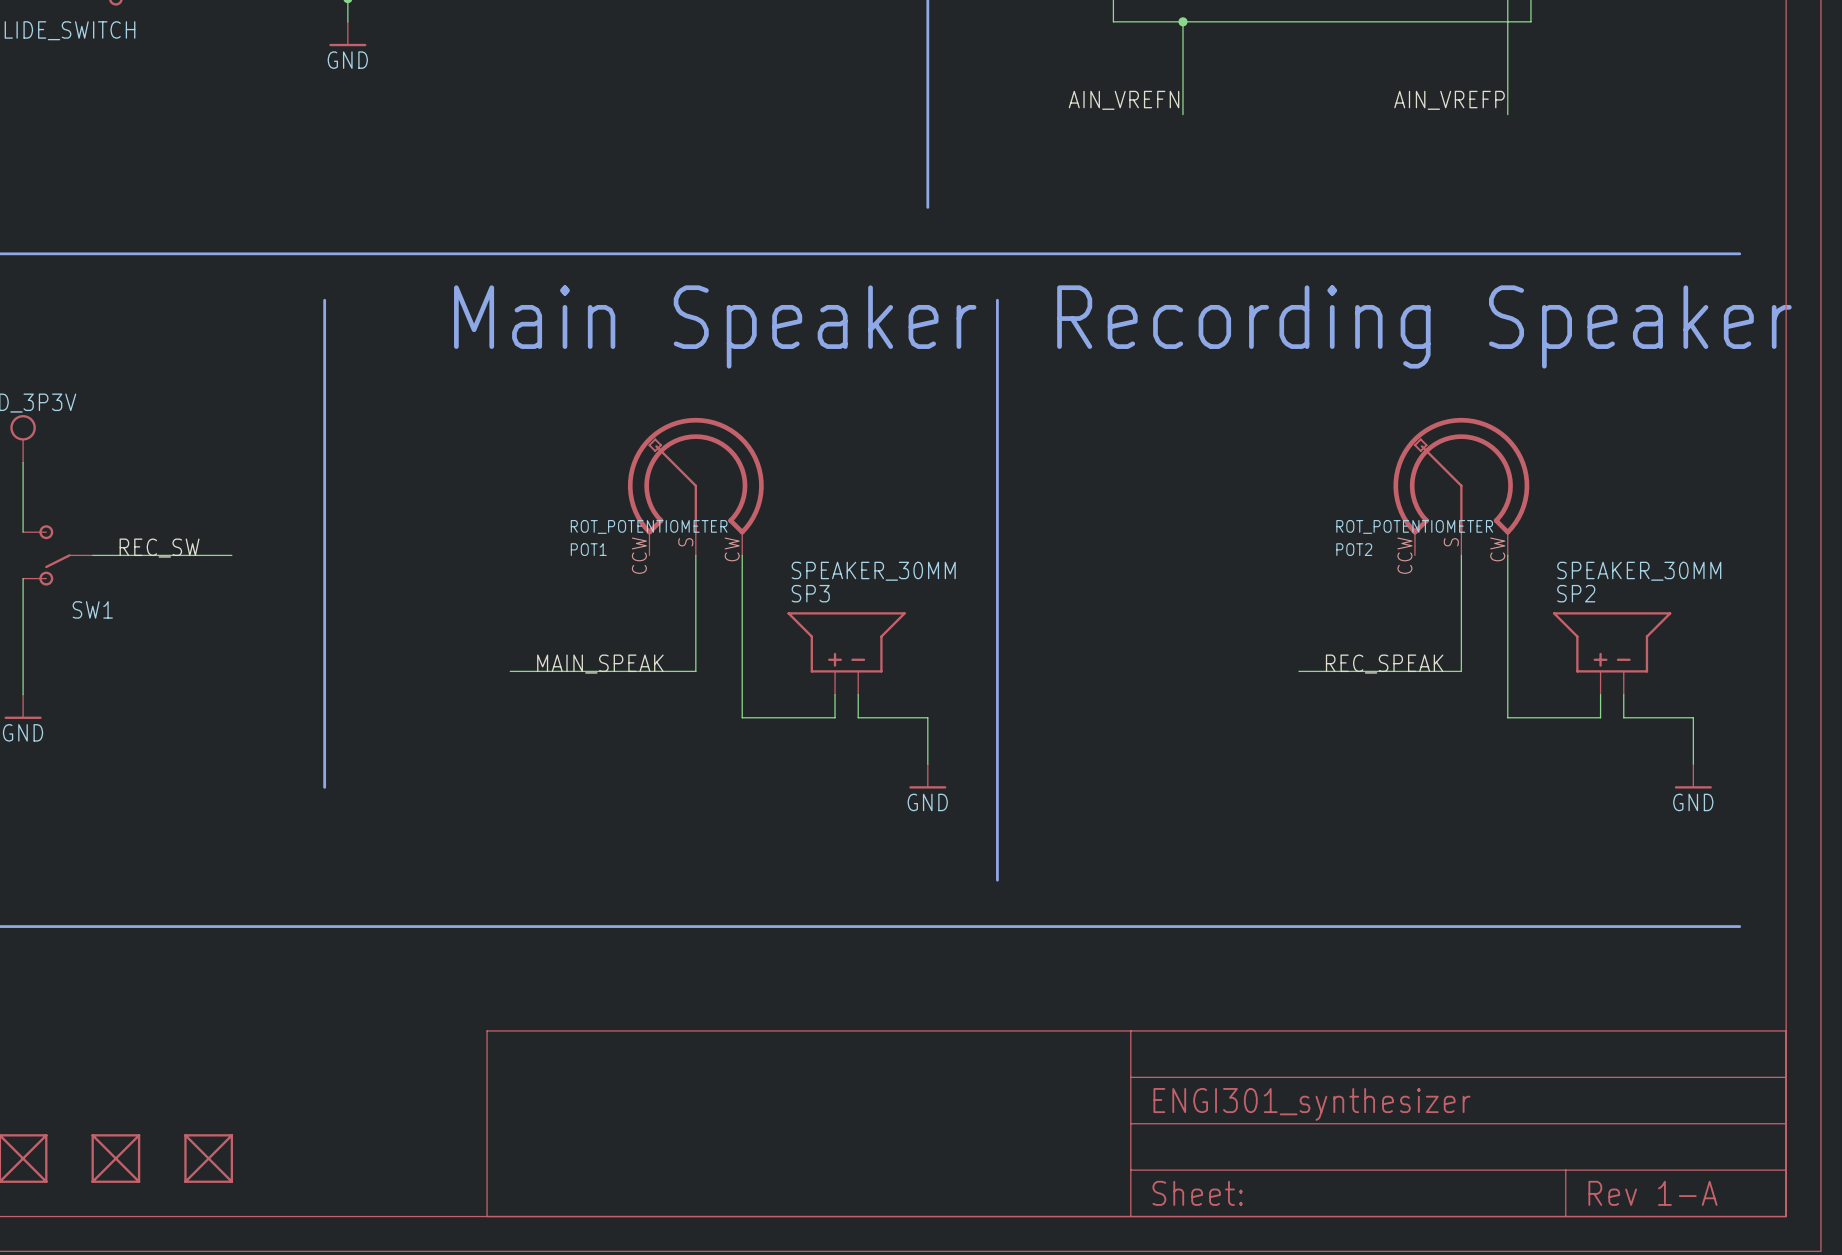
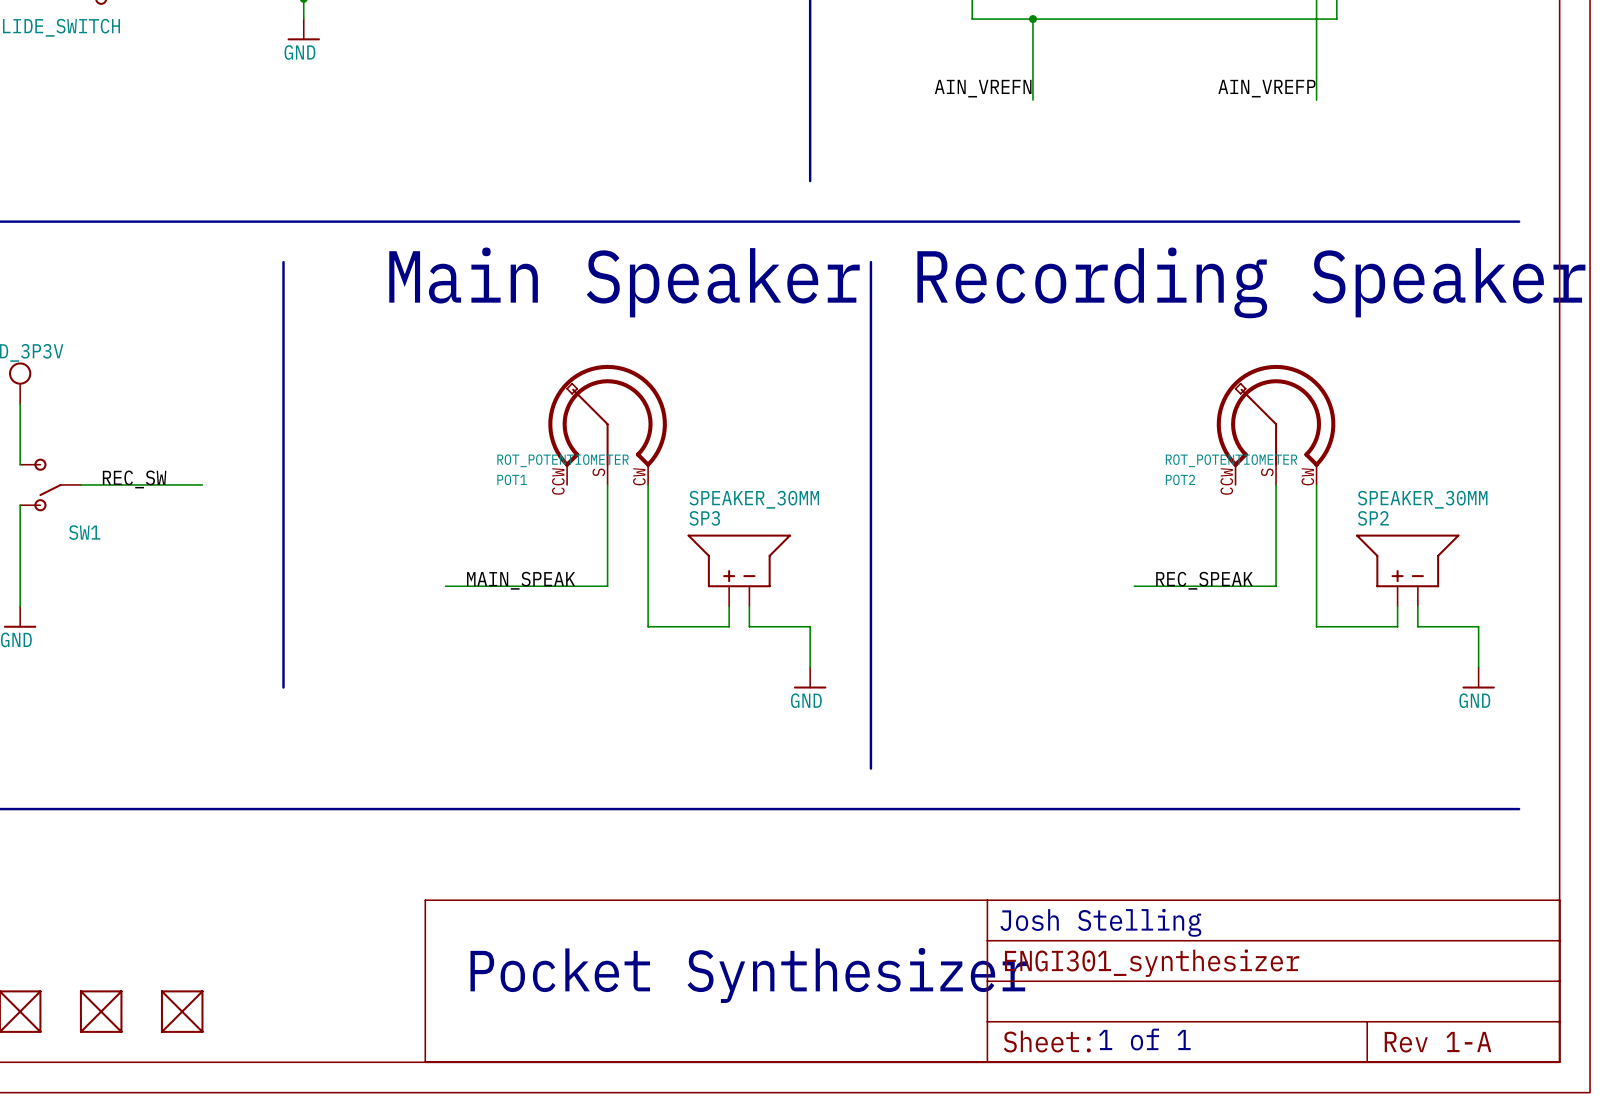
text: none -> Josh Stelling (1100, 922)
text: none -> Pocket Synthesizer (749, 975)
text: none -> 1 of 1 (1144, 1039)

